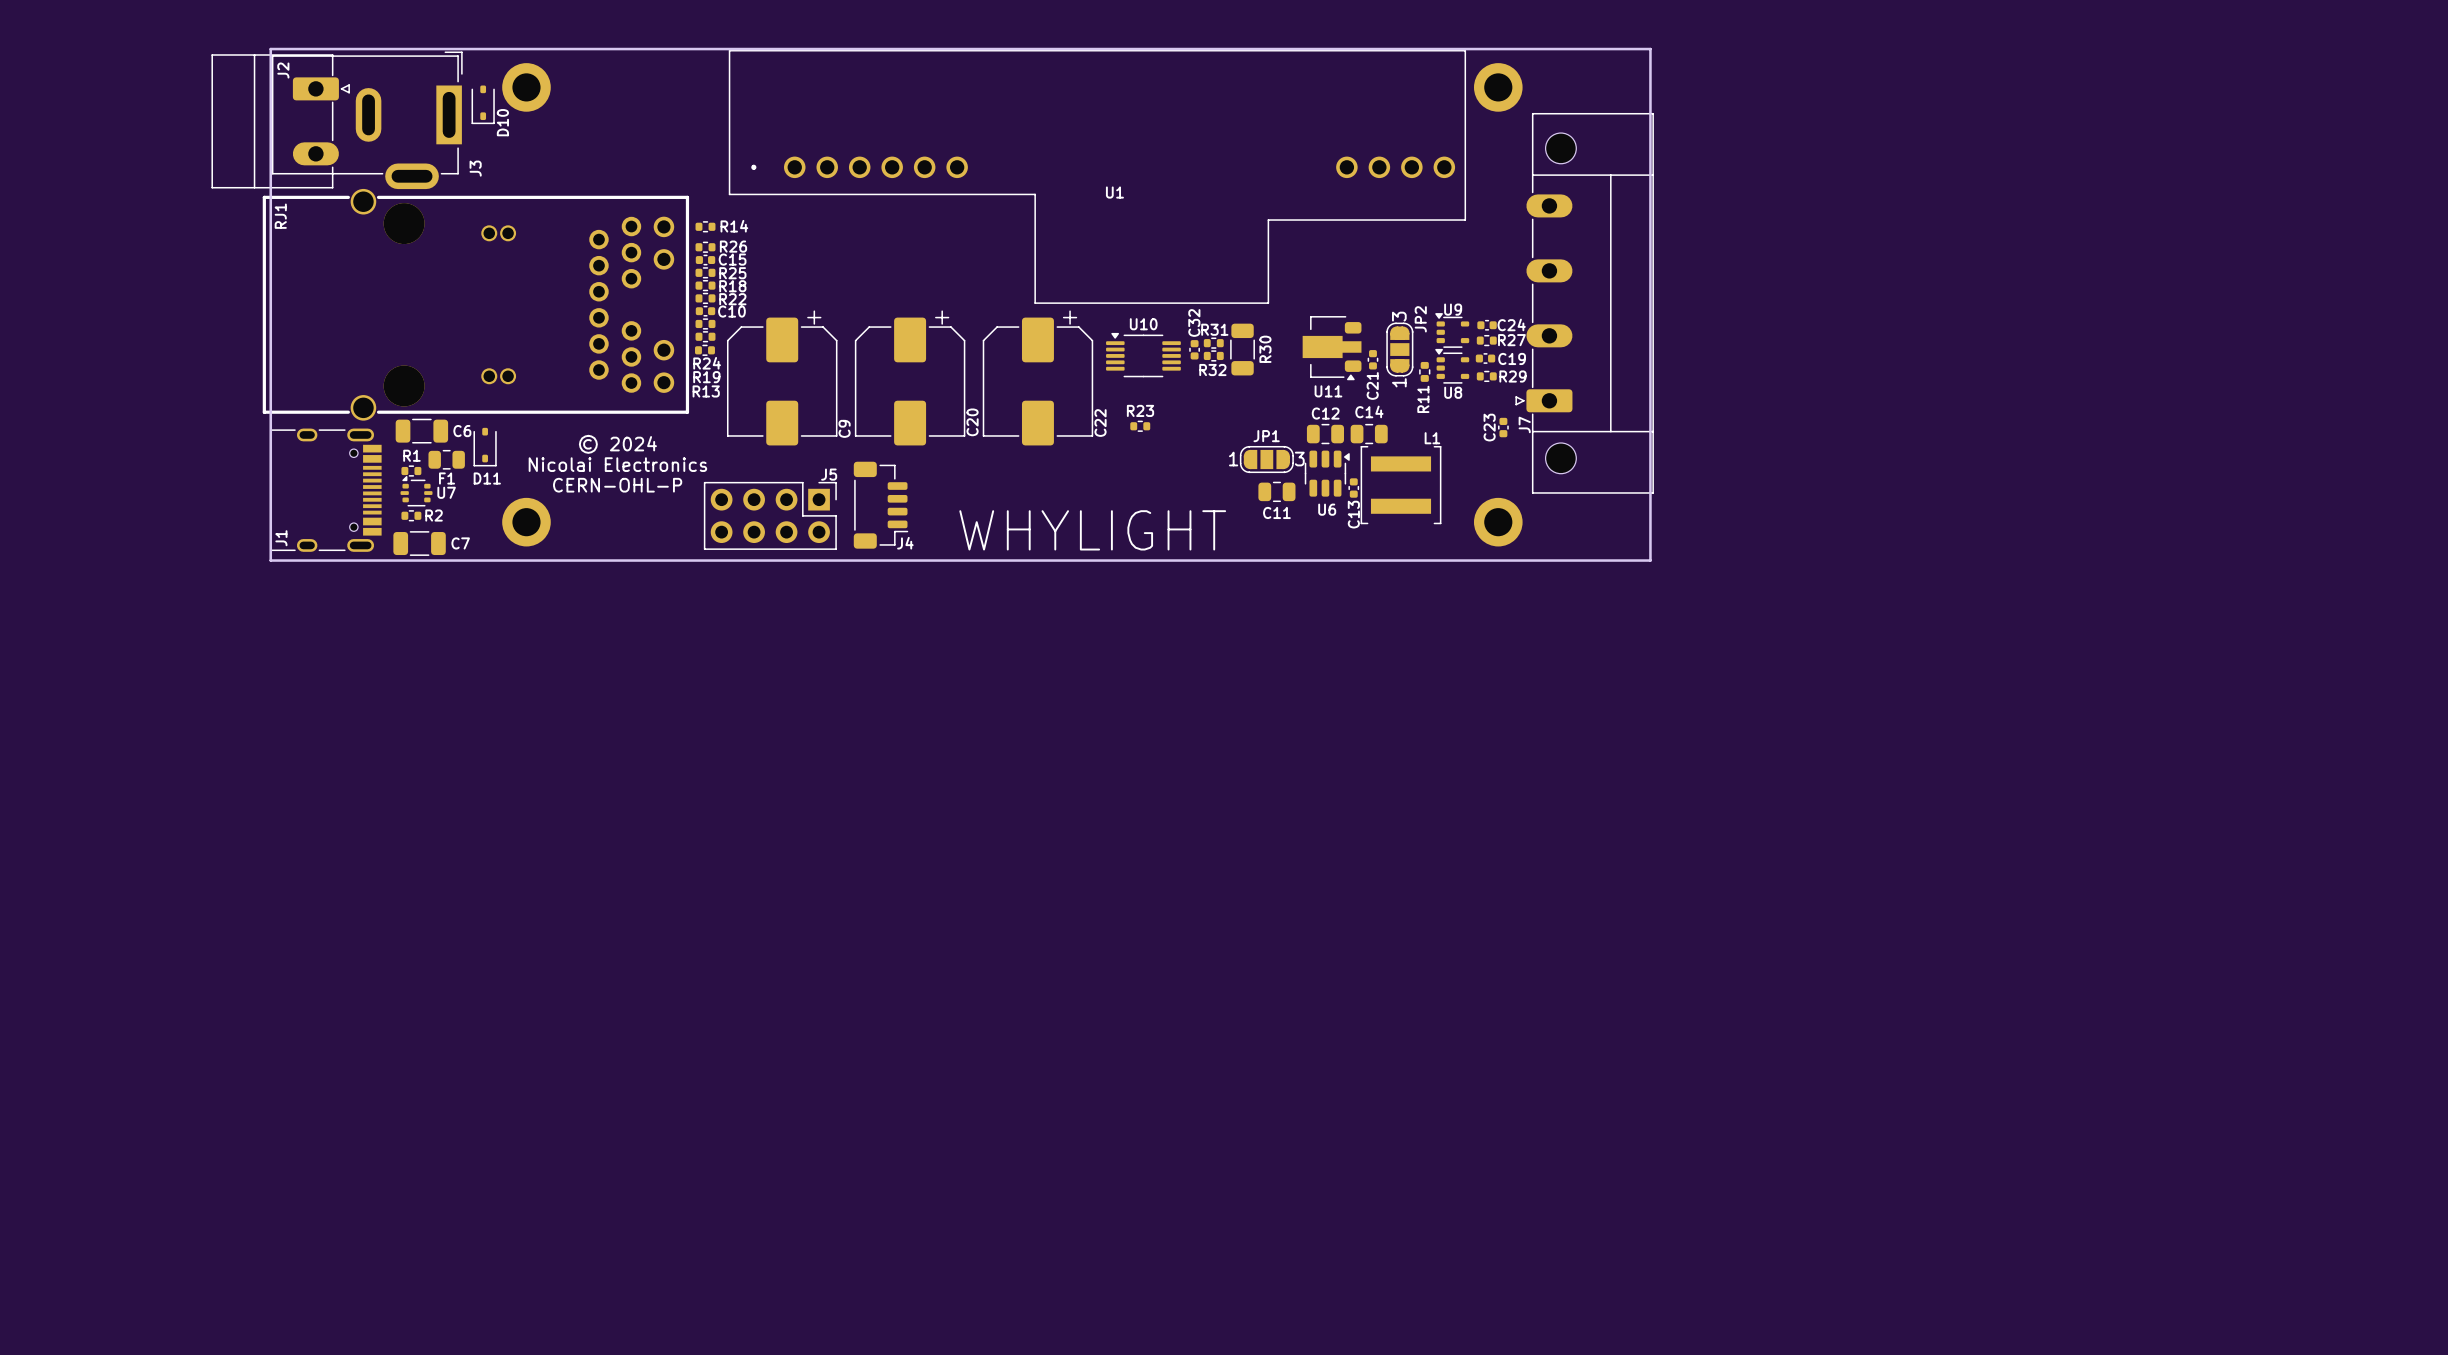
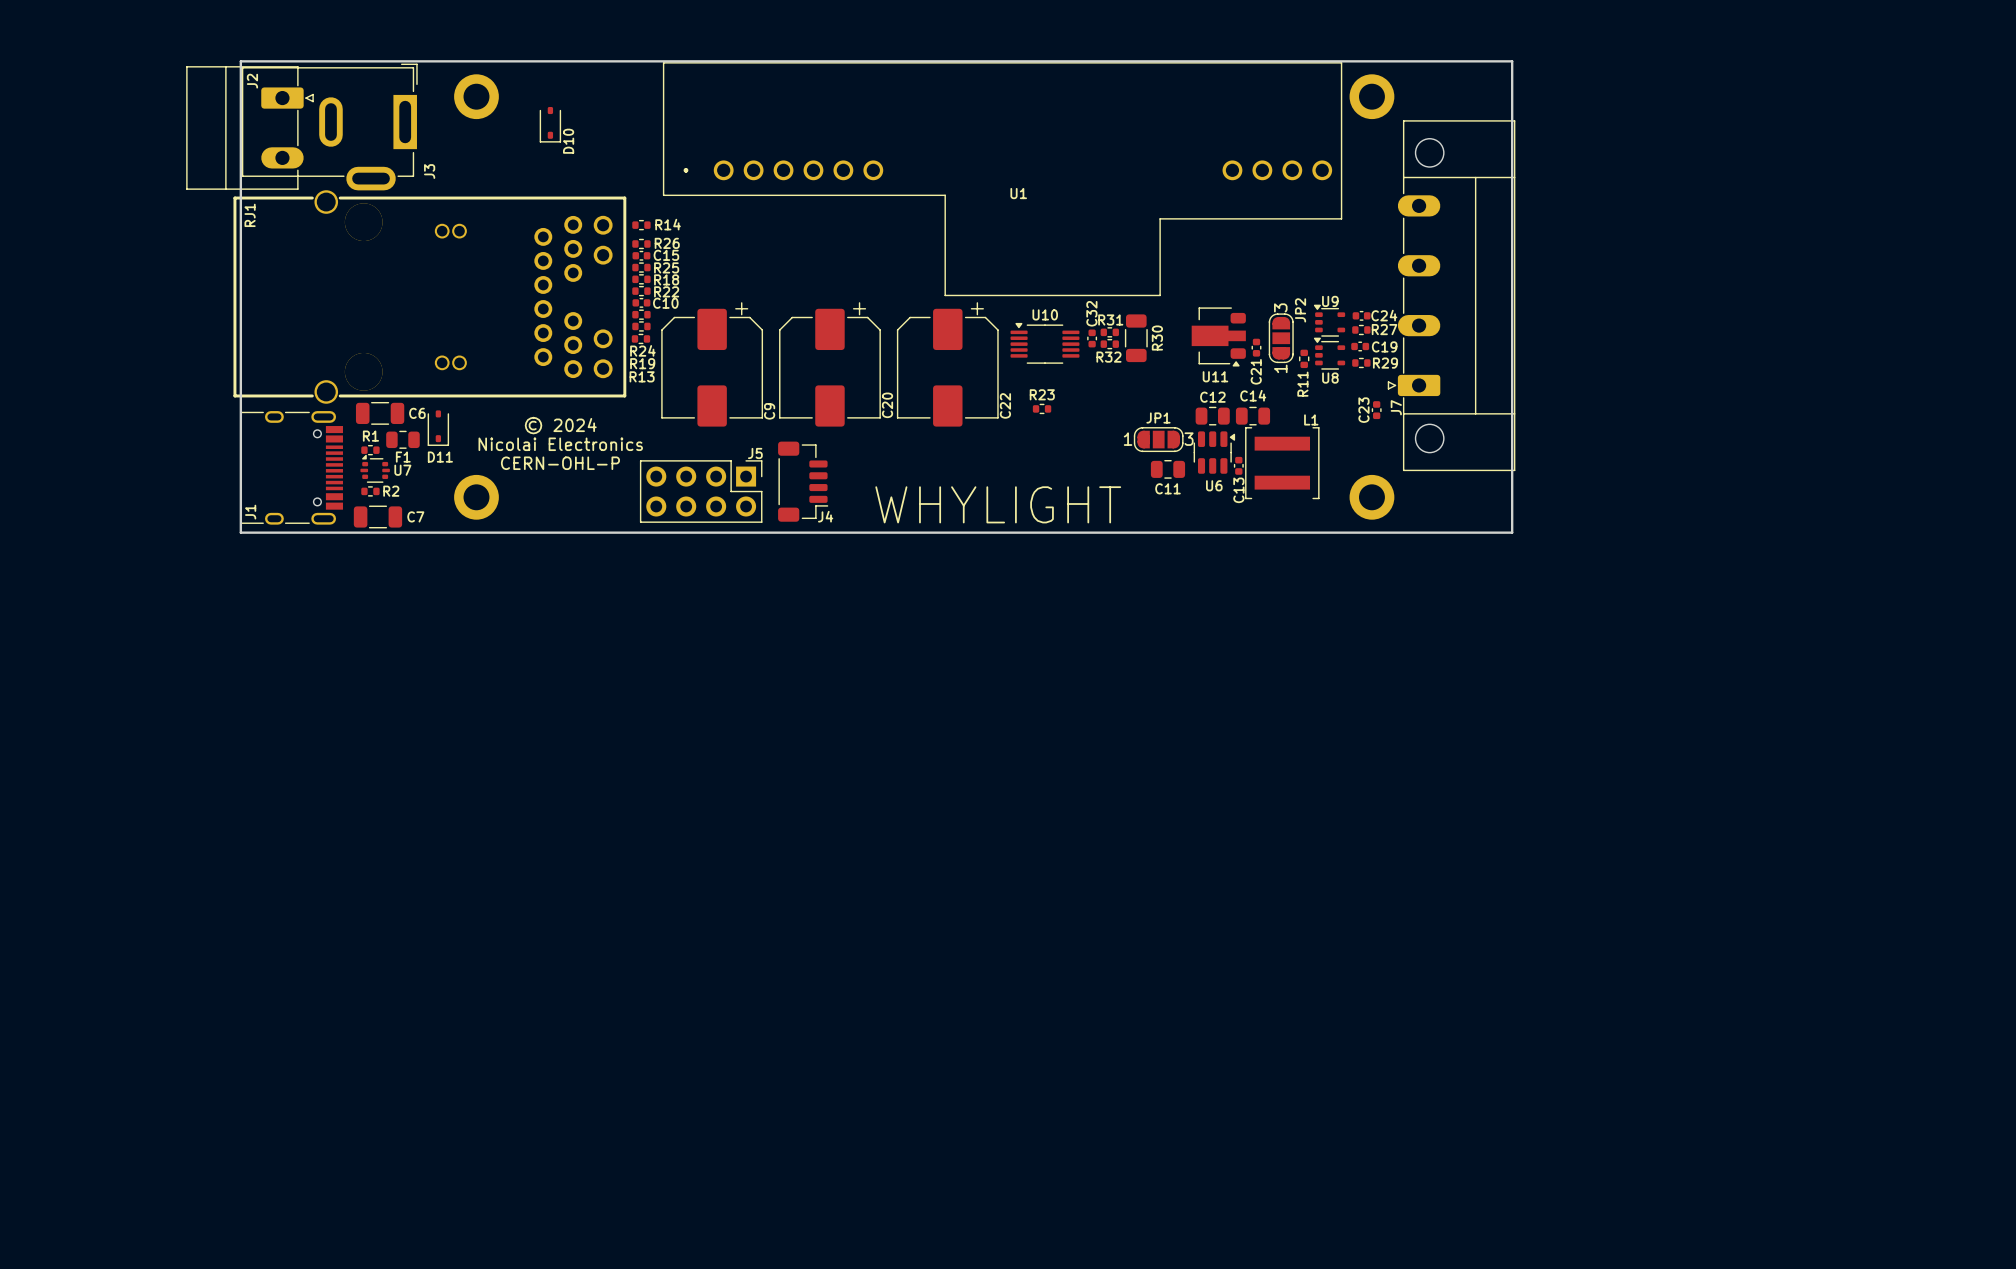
D10 position: (483, 104) -> (550, 124)

